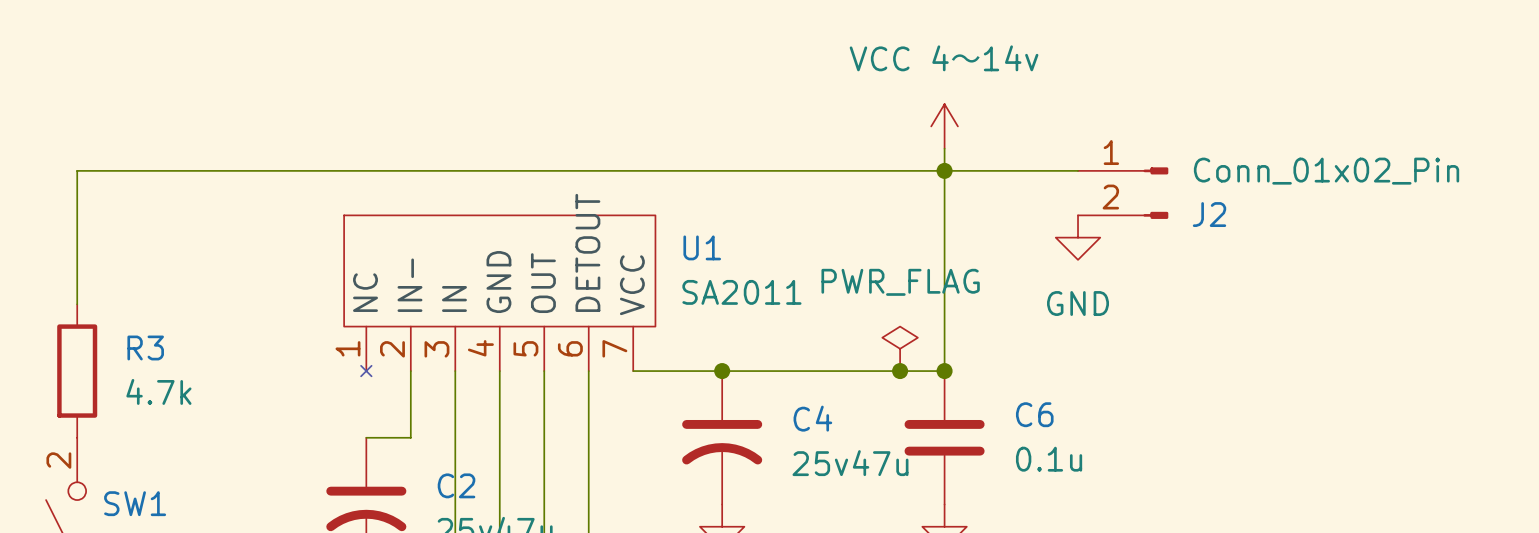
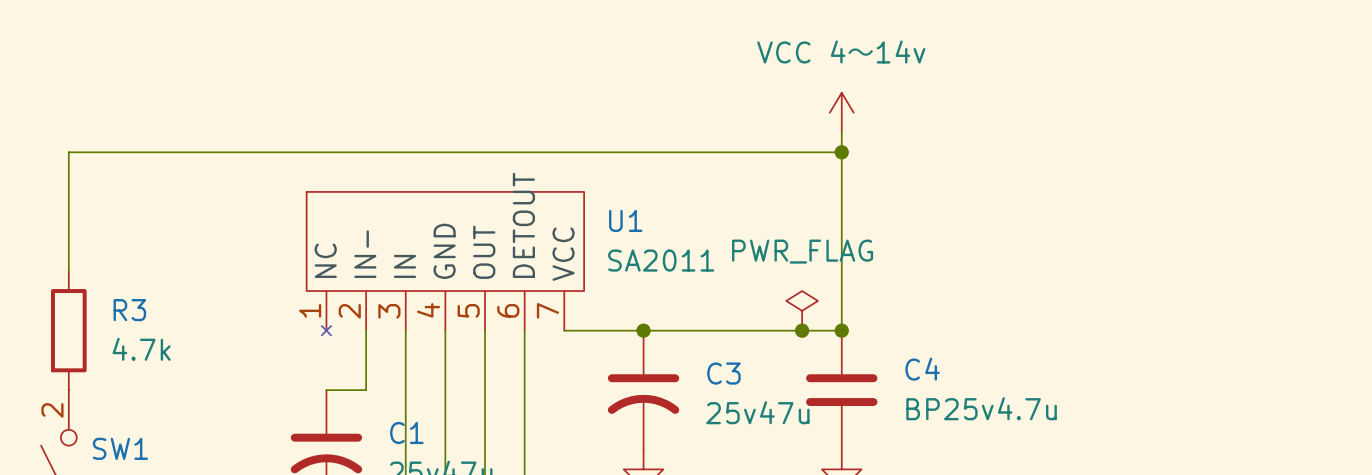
wire: (944, 170) (1078, 170) -> none
J2: Conn_01x02_Pin (1123, 193) -> none
power symbol: GND (1078, 237) -> none
C6 name: C6 (1034, 414) -> C4 (922, 369)
C4 name: C4 (812, 418) -> C3 (723, 373)
C6 value: 0.1u (1049, 459) -> BP25v4.7u (981, 408)
C2 name: C2 (456, 485) -> C1 (406, 432)

